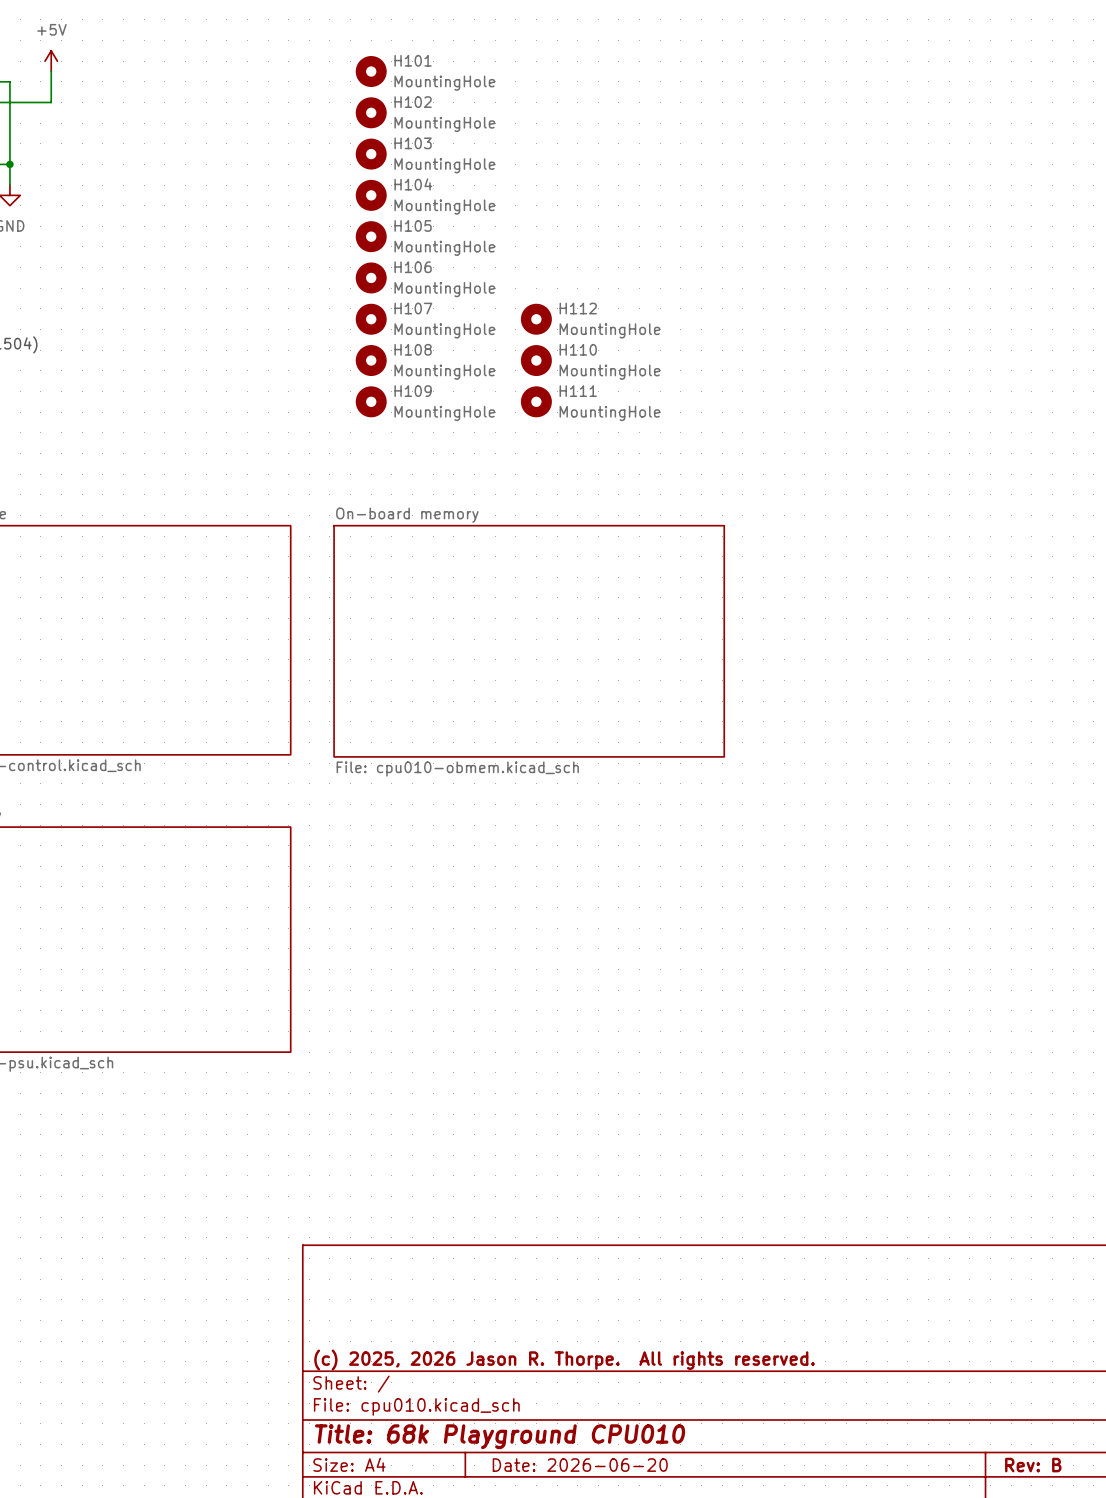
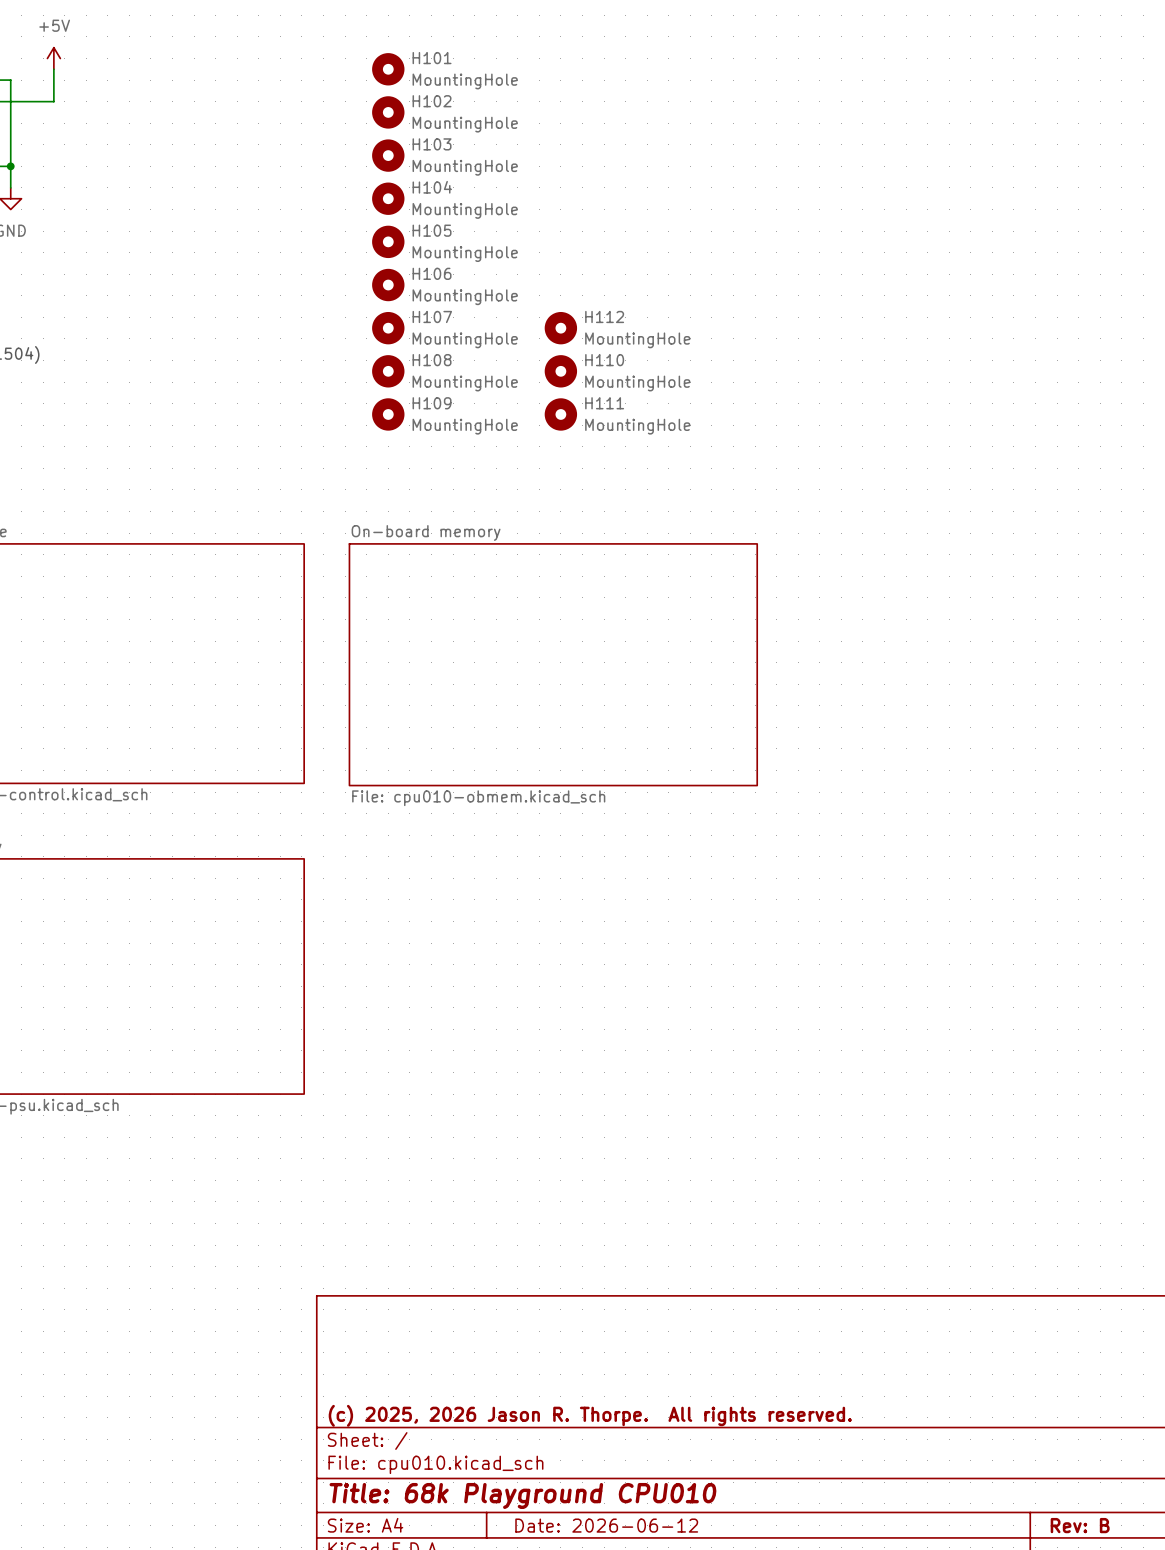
title block: Date: 2026-06-20 (580, 1465) -> Date: 2026-06-12 (606, 1525)

